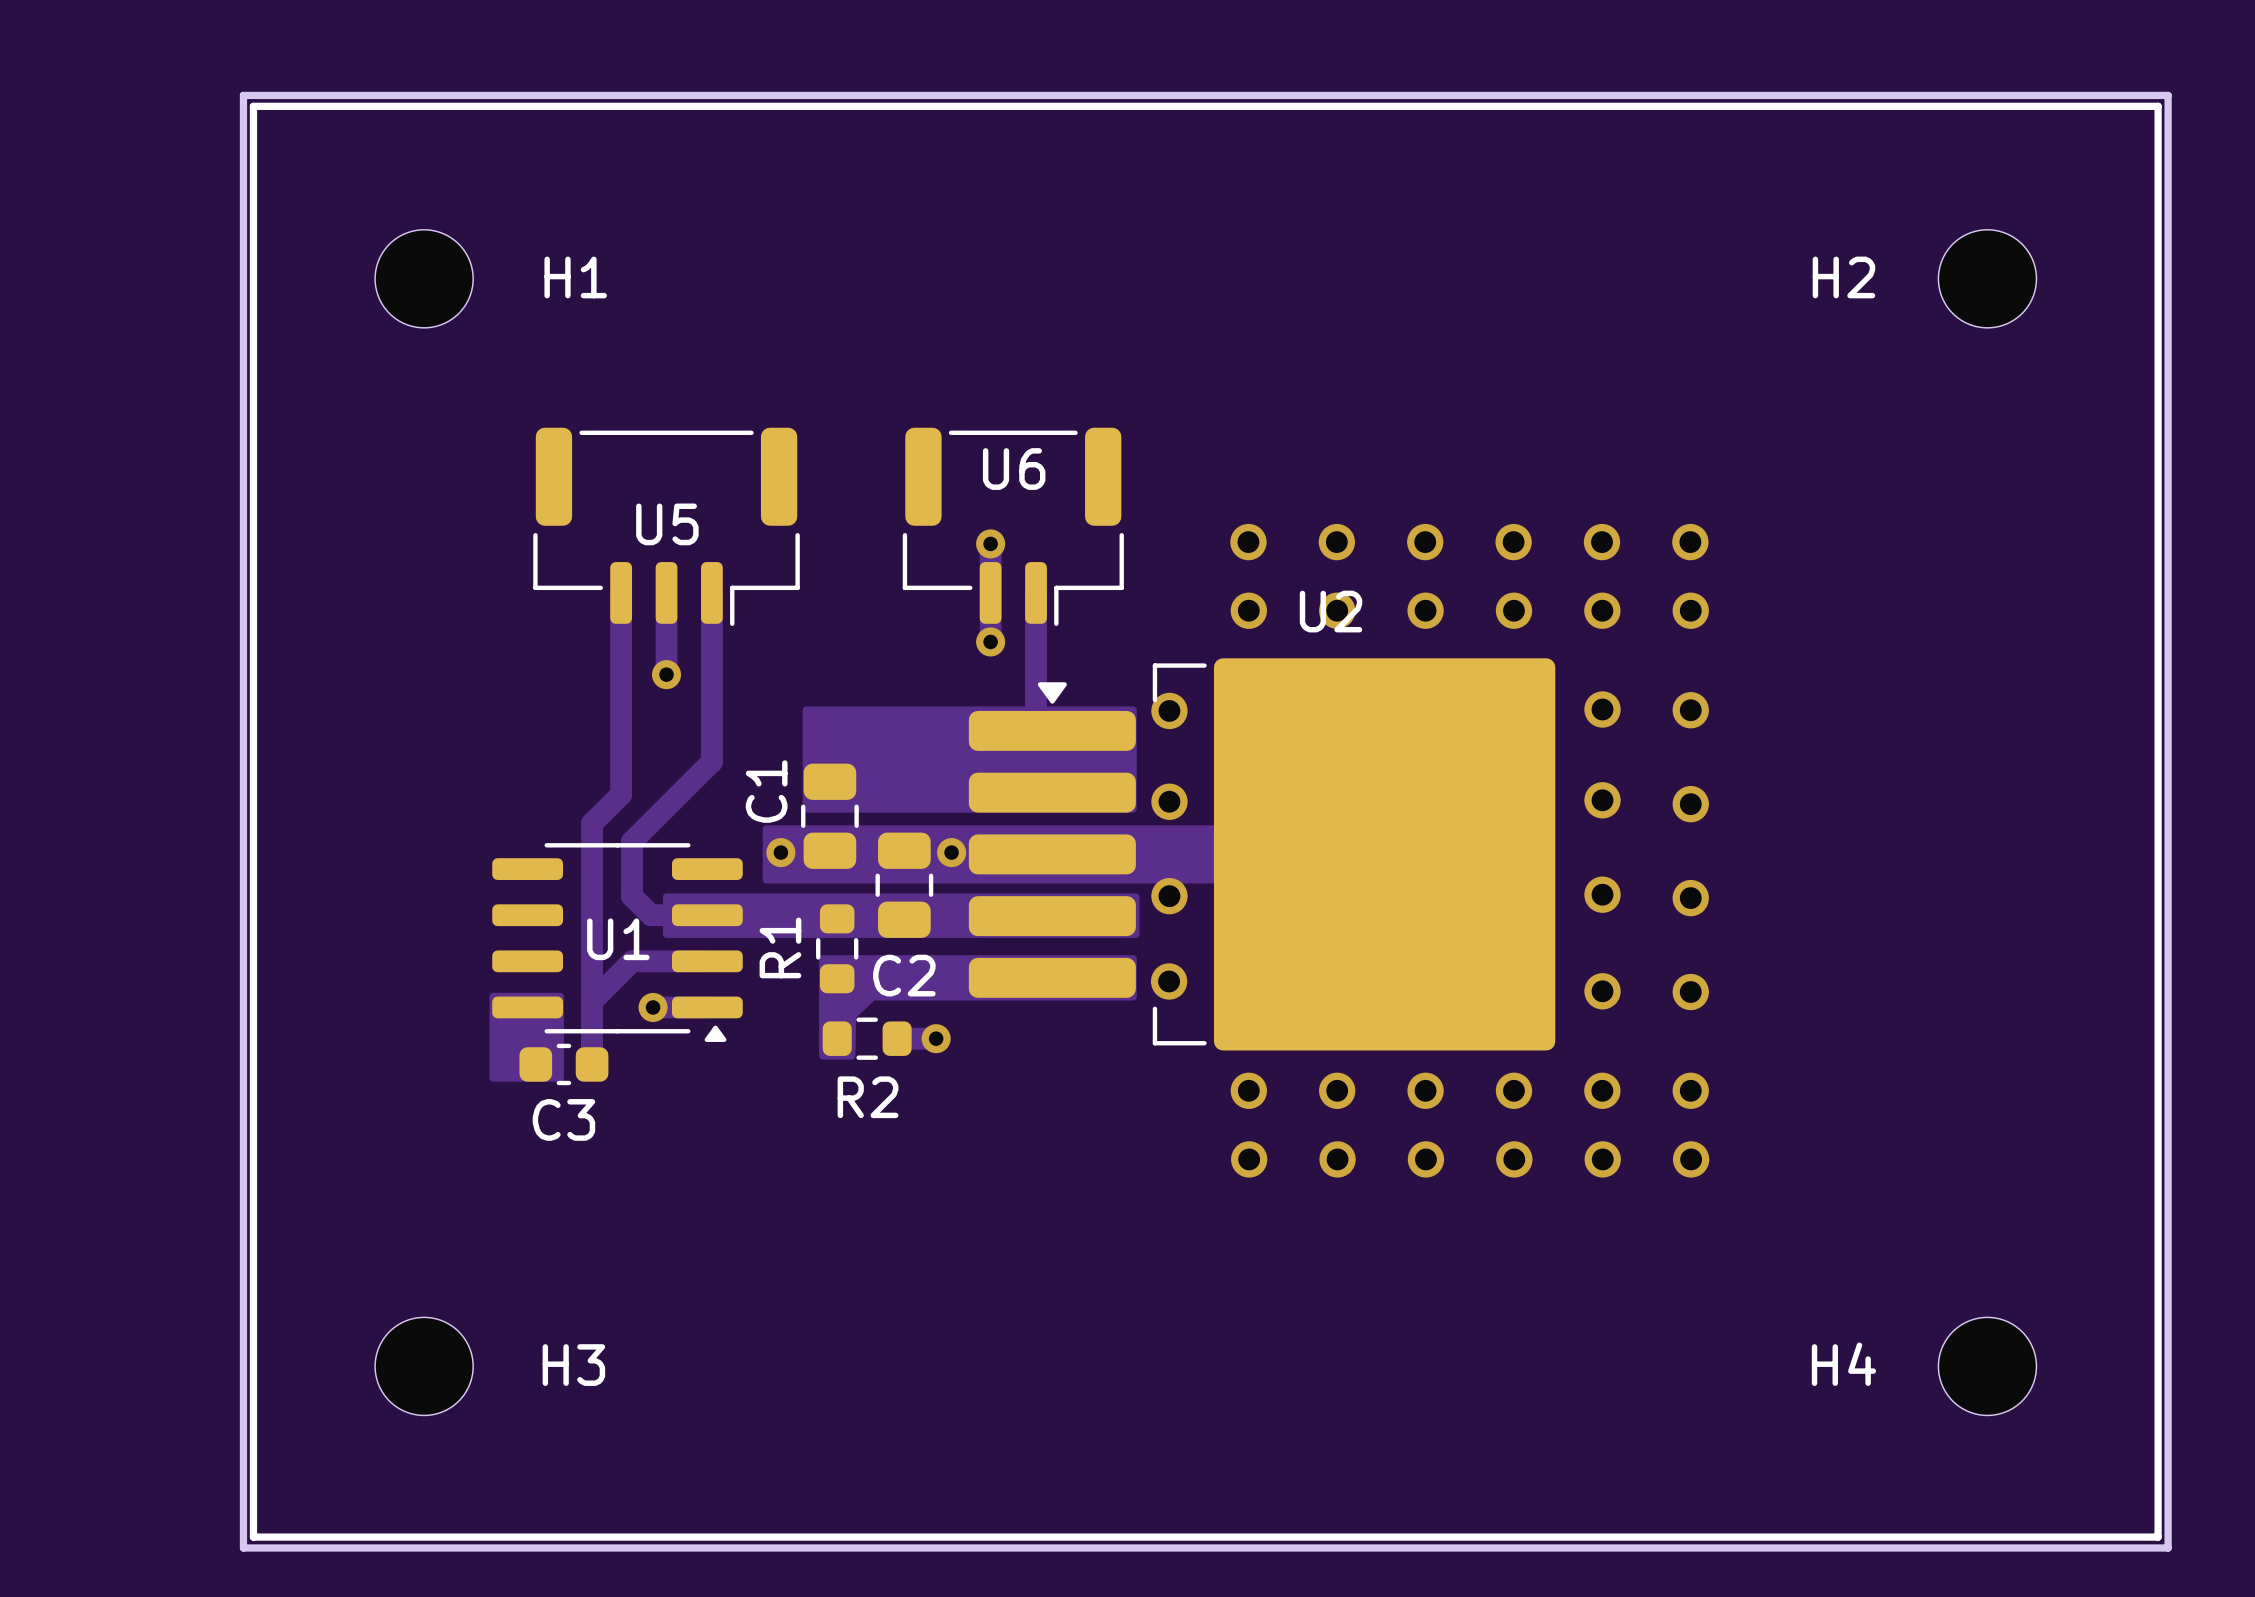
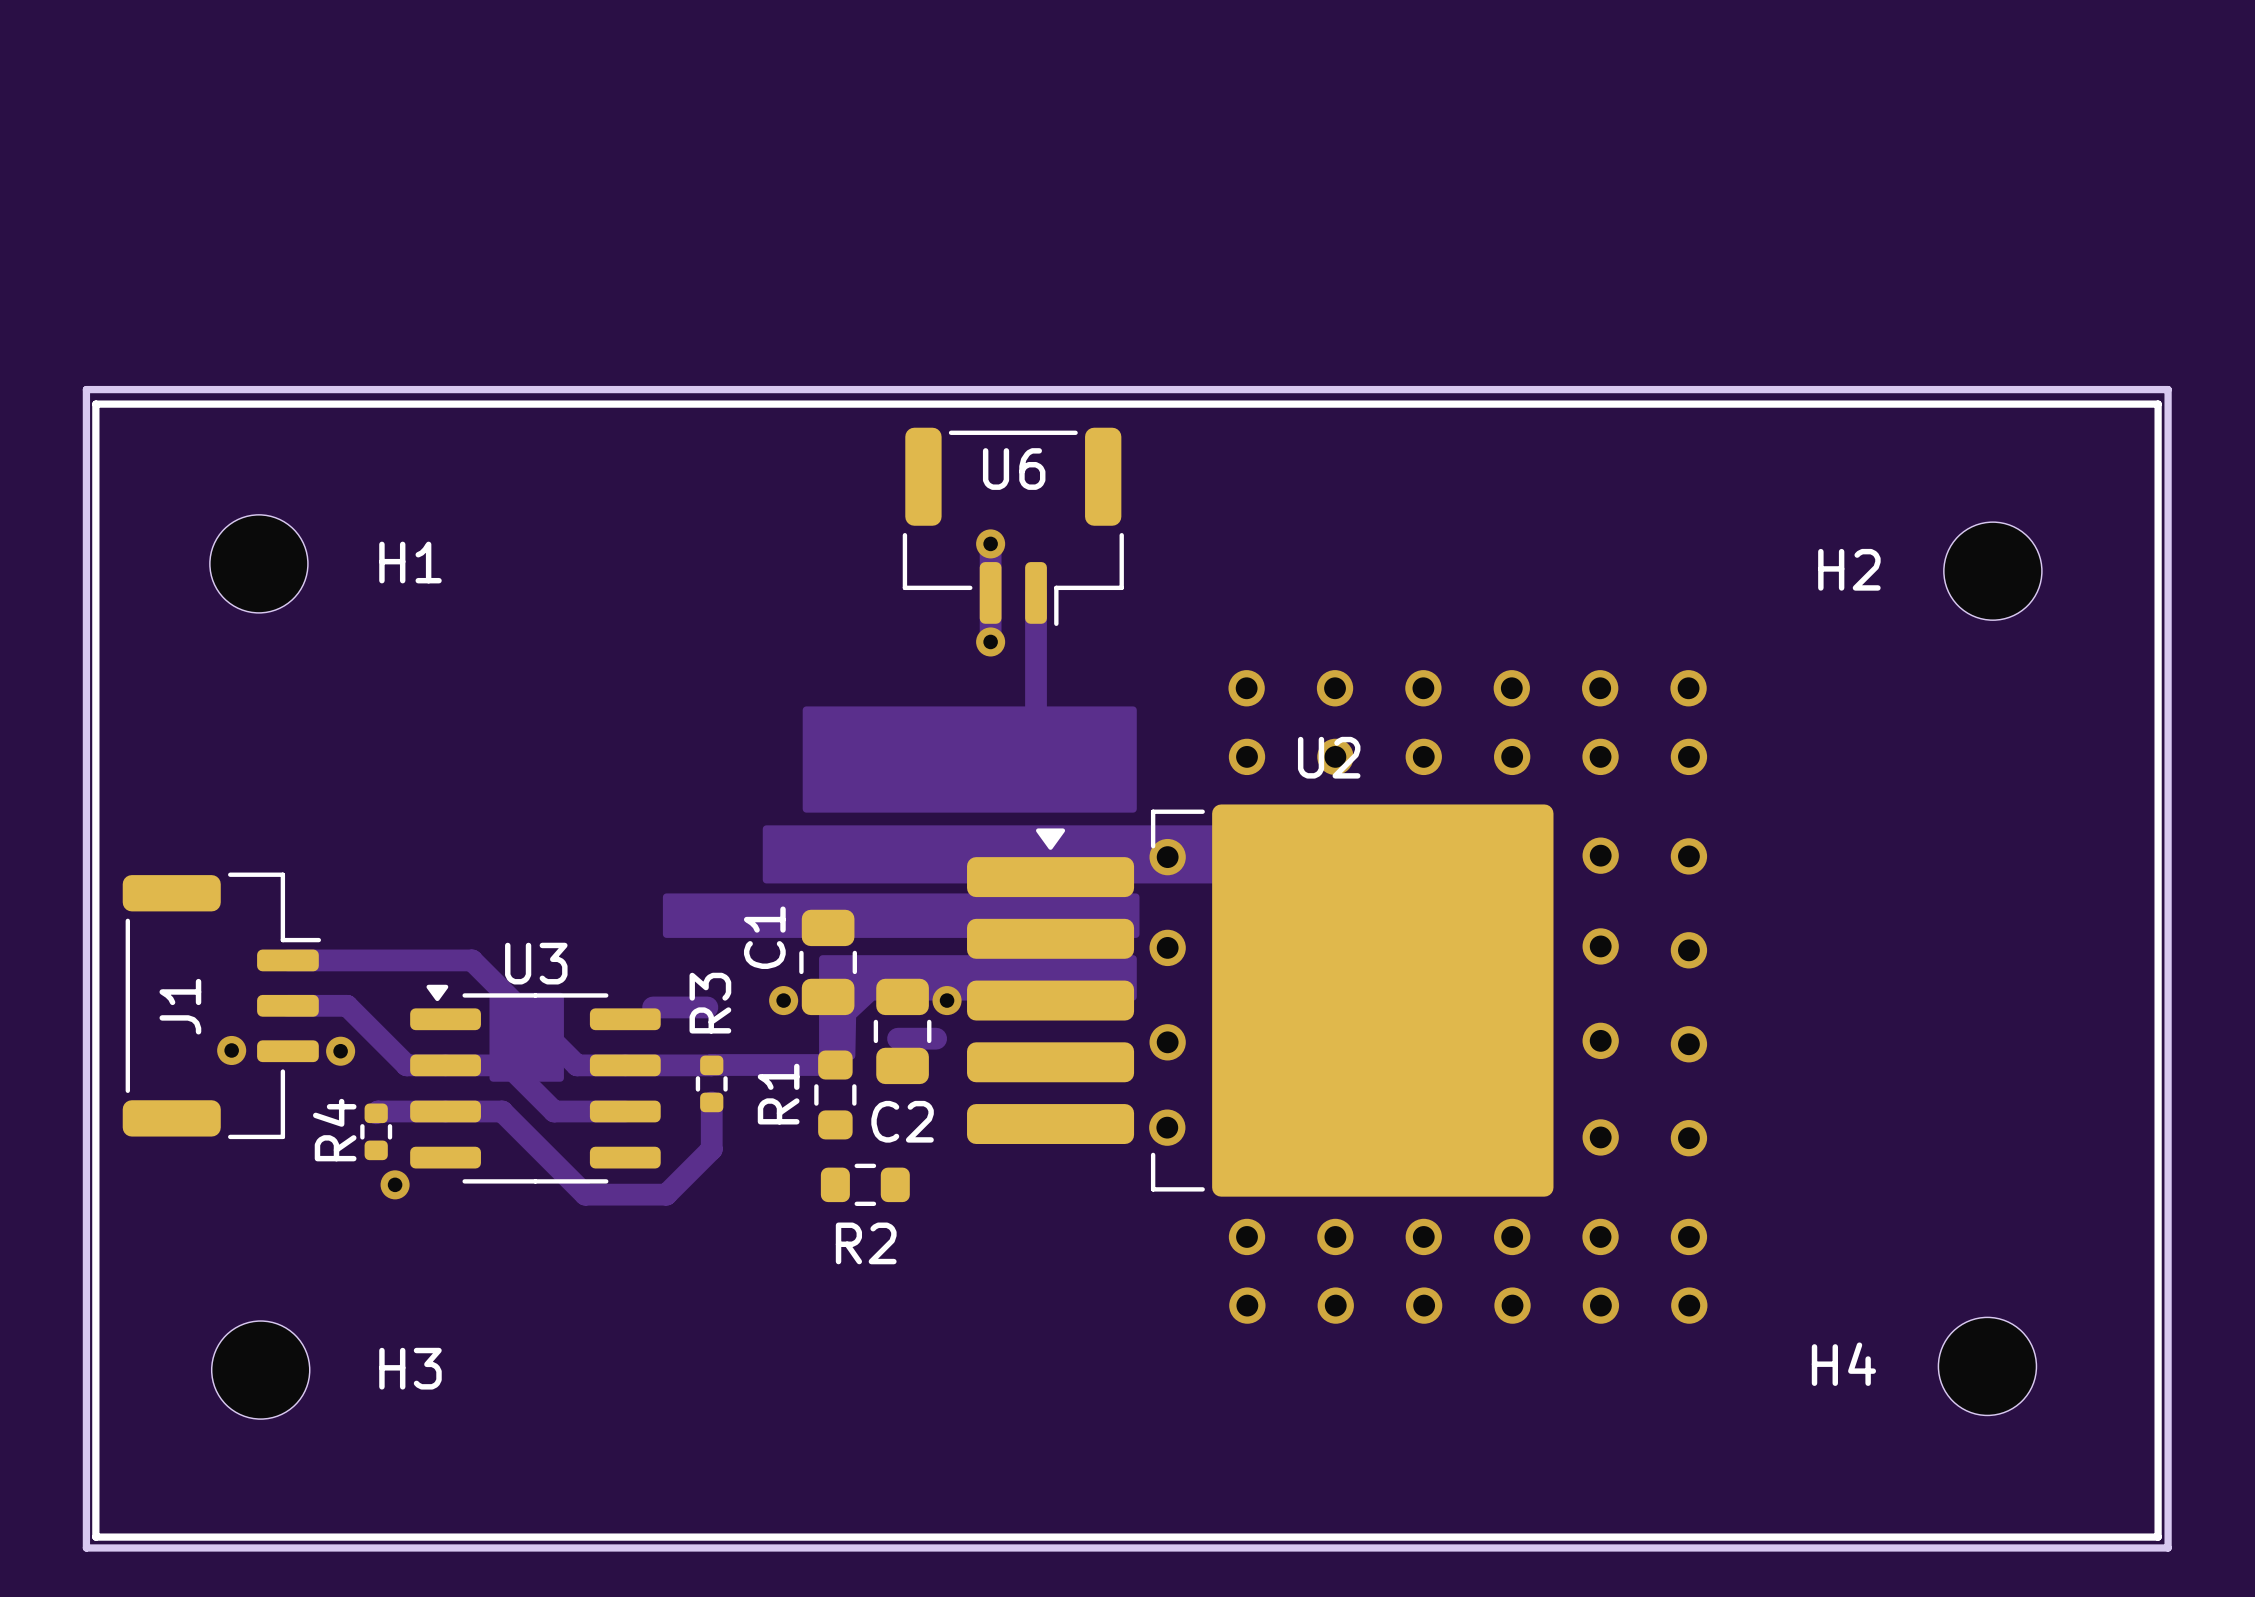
H1 position: (424, 278) -> (258, 563)
H2 position: (1987, 278) -> (1992, 571)
board edge: (2168, 389) (2168, 95) (243, 95) (243, 1547) -> (2168, 389) (86, 389) (86, 1547) (243, 1547)
line: (2158, 404) (2158, 106) (253, 106) (253, 1537) -> (2158, 404) (95, 404) (95, 1537) (253, 1537)
U5: (666, 526) -> none
via: (1248, 542) -> none
via: (1336, 542) -> none
via: (1425, 542) -> none
via: (1513, 542) -> none
via: (1602, 542) -> none
via: (1690, 542) -> none
track: (621, 592) (621, 794) (592, 823) (592, 1064) -> none
track: (711, 592) (711, 761) (632, 841) (632, 896) (651, 915) (707, 915) -> none
via: (1248, 610) -> none
via: (1337, 610) -> none
via: (1425, 610) -> none
via: (1513, 610) -> none
via: (1602, 610) -> none
via: (1690, 610) -> none
track: (666, 622) (666, 674) -> none
via: (666, 674) -> none
via: none -> (1246, 688)
via: none -> (1335, 688)
via: none -> (1423, 688)
via: none -> (1511, 688)
via position: (1602, 709) -> (1600, 688)
via: (1169, 710) -> none
via position: (1690, 710) -> (1688, 688)
via: none -> (1247, 756)
via: none -> (1335, 756)
via: none -> (1423, 756)
via: none -> (1512, 756)
via: none -> (1600, 756)
via: none -> (1688, 756)
via: (1602, 800) -> none
via: (1169, 801) -> none
via: (1690, 804) -> none
C1 position: (829, 816) -> (828, 962)
via: (780, 852) -> none
via: (951, 852) -> none
U2 position: (1262, 854) -> (1260, 1000)
via: none -> (1600, 855)
via: none -> (1688, 856)
via: none -> (1167, 857)
C2 position: (904, 885) -> (902, 1031)
via: (1602, 894) -> none
via: (1169, 896) -> none
via: (1690, 898) -> none
U1: (617, 942) -> none
via: none -> (1600, 946)
R1 position: (837, 948) -> (835, 1094)
via: none -> (1688, 950)
track: none -> (287, 960) (472, 960) (577, 1065) (711, 1065)
track: (707, 961) (632, 961) (592, 1001) -> none
via position: (1169, 981) -> (1167, 947)
via: (1602, 991) -> none
via: (1690, 992) -> none
via: none -> (783, 1000)
J1: none -> (221, 1005)
track: none -> (287, 1005) (347, 1005) (406, 1065) (508, 1065) (554, 1111) (625, 1111)
via: (653, 1007) -> none
R2 position: (867, 1038) -> (865, 1184)
via position: (936, 1038) -> (947, 1000)
via: none -> (1600, 1040)
via: none -> (1167, 1042)
via: none -> (1688, 1044)
via: none -> (231, 1050)
via: none -> (340, 1051)
C3: (563, 1064) -> none
track: none -> (712, 1065) (835, 1065)
R3: none -> (711, 1083)
U3: none -> (535, 1084)
via: (1248, 1090) -> none
via: (1337, 1090) -> none
via: (1425, 1090) -> none
via: (1513, 1090) -> none
via: (1602, 1090) -> none
via: (1690, 1090) -> none
track: none -> (711, 1102) (711, 1149) (666, 1194) (585, 1194) (502, 1111) (378, 1111) (376, 1113)
via: none -> (1167, 1127)
R4: none -> (376, 1131)
via: (1249, 1159) -> none
via: (1337, 1159) -> none
via: (1425, 1159) -> none
via: (1514, 1159) -> none
via position: (1602, 1159) -> (1600, 1137)
via position: (1691, 1159) -> (1688, 1138)
via: none -> (395, 1184)
via: none -> (1247, 1236)
via: none -> (1335, 1236)
via: none -> (1423, 1236)
via: none -> (1512, 1236)
via: none -> (1600, 1236)
via: none -> (1688, 1236)
via: none -> (1247, 1305)
via: none -> (1335, 1305)
via: none -> (1424, 1305)
via: none -> (1512, 1305)
via: none -> (1600, 1305)
via: none -> (1689, 1305)
H3 position: (424, 1366) -> (260, 1370)

